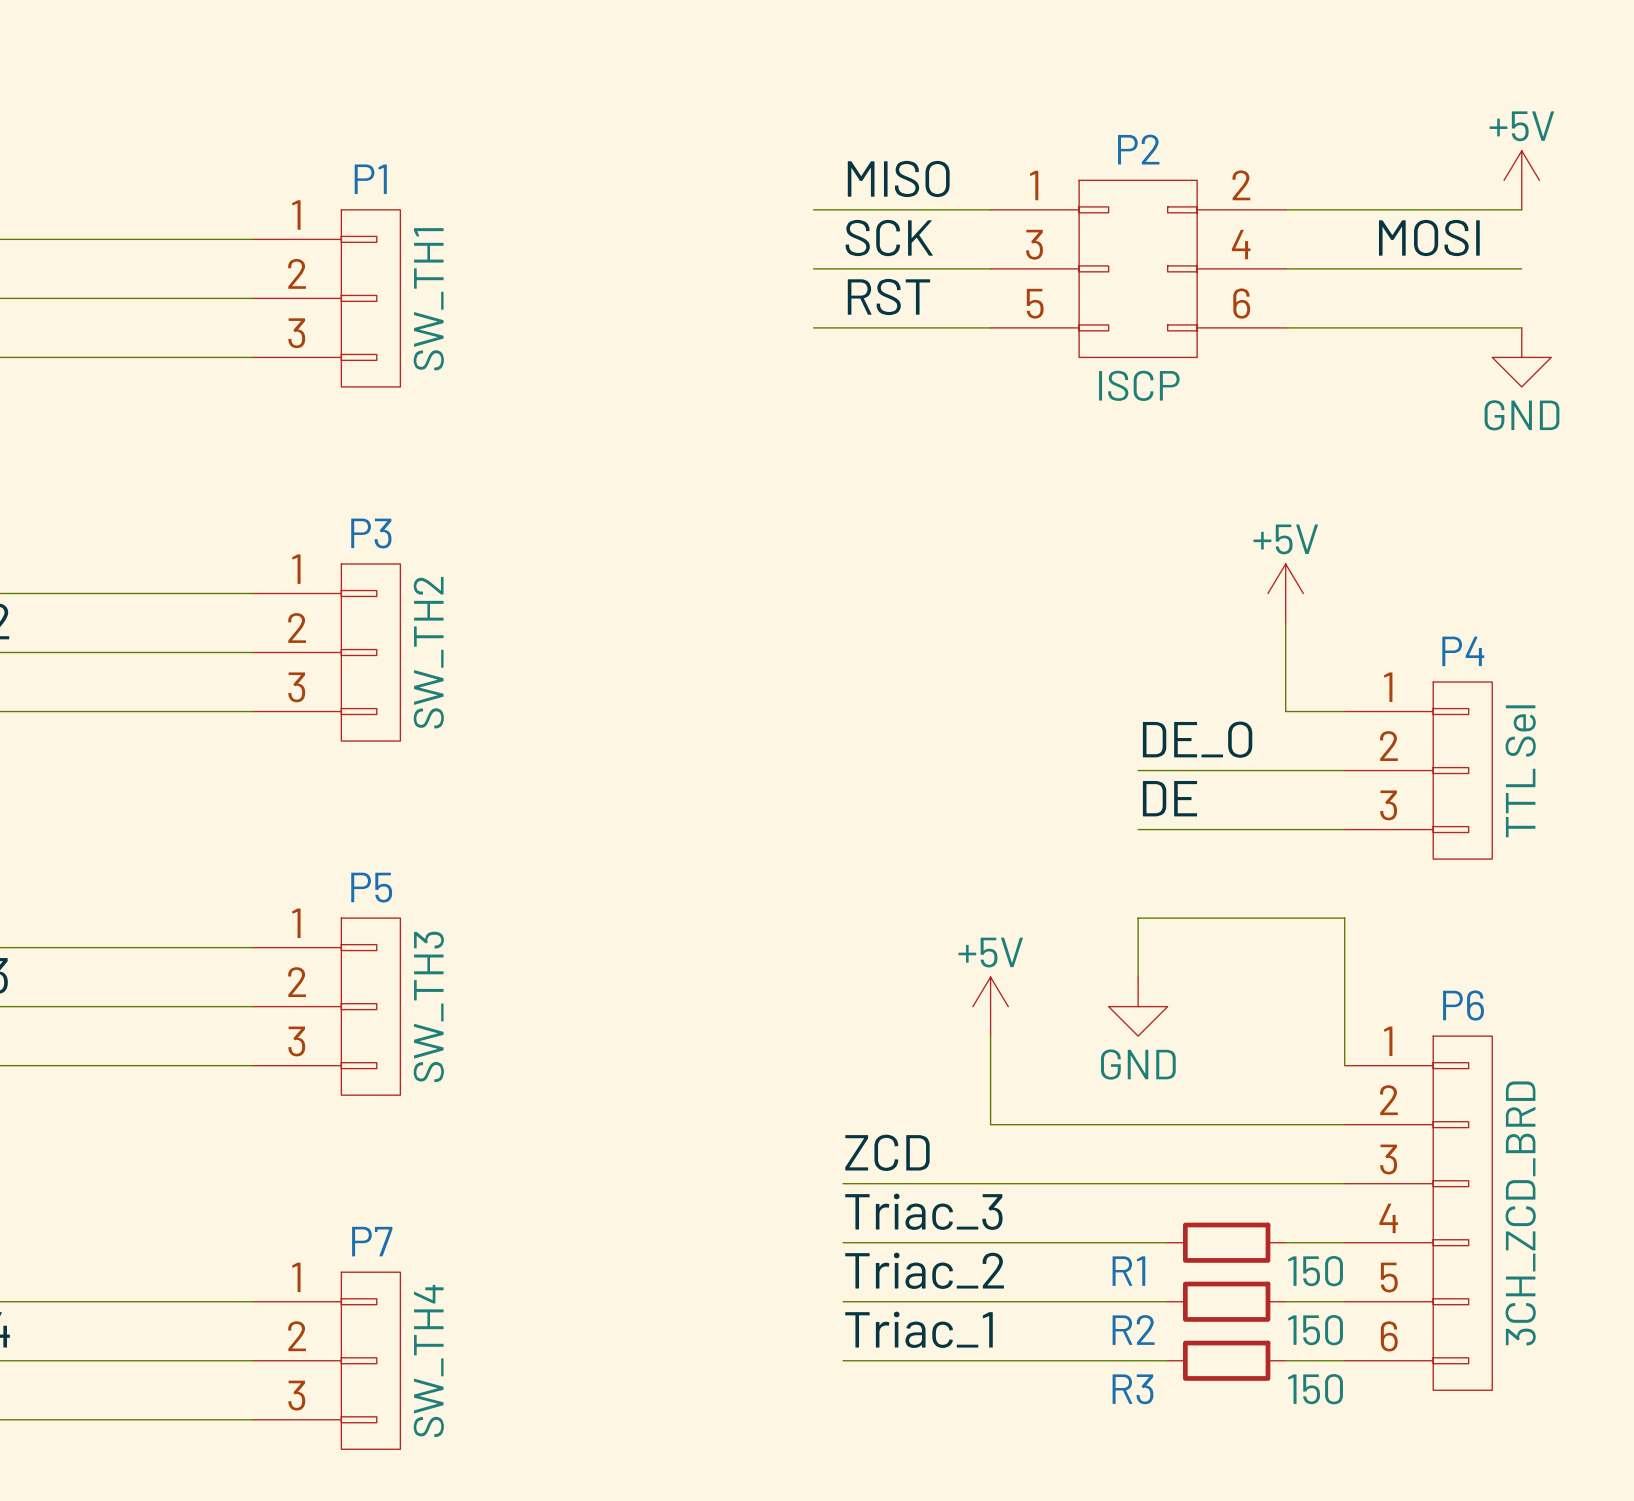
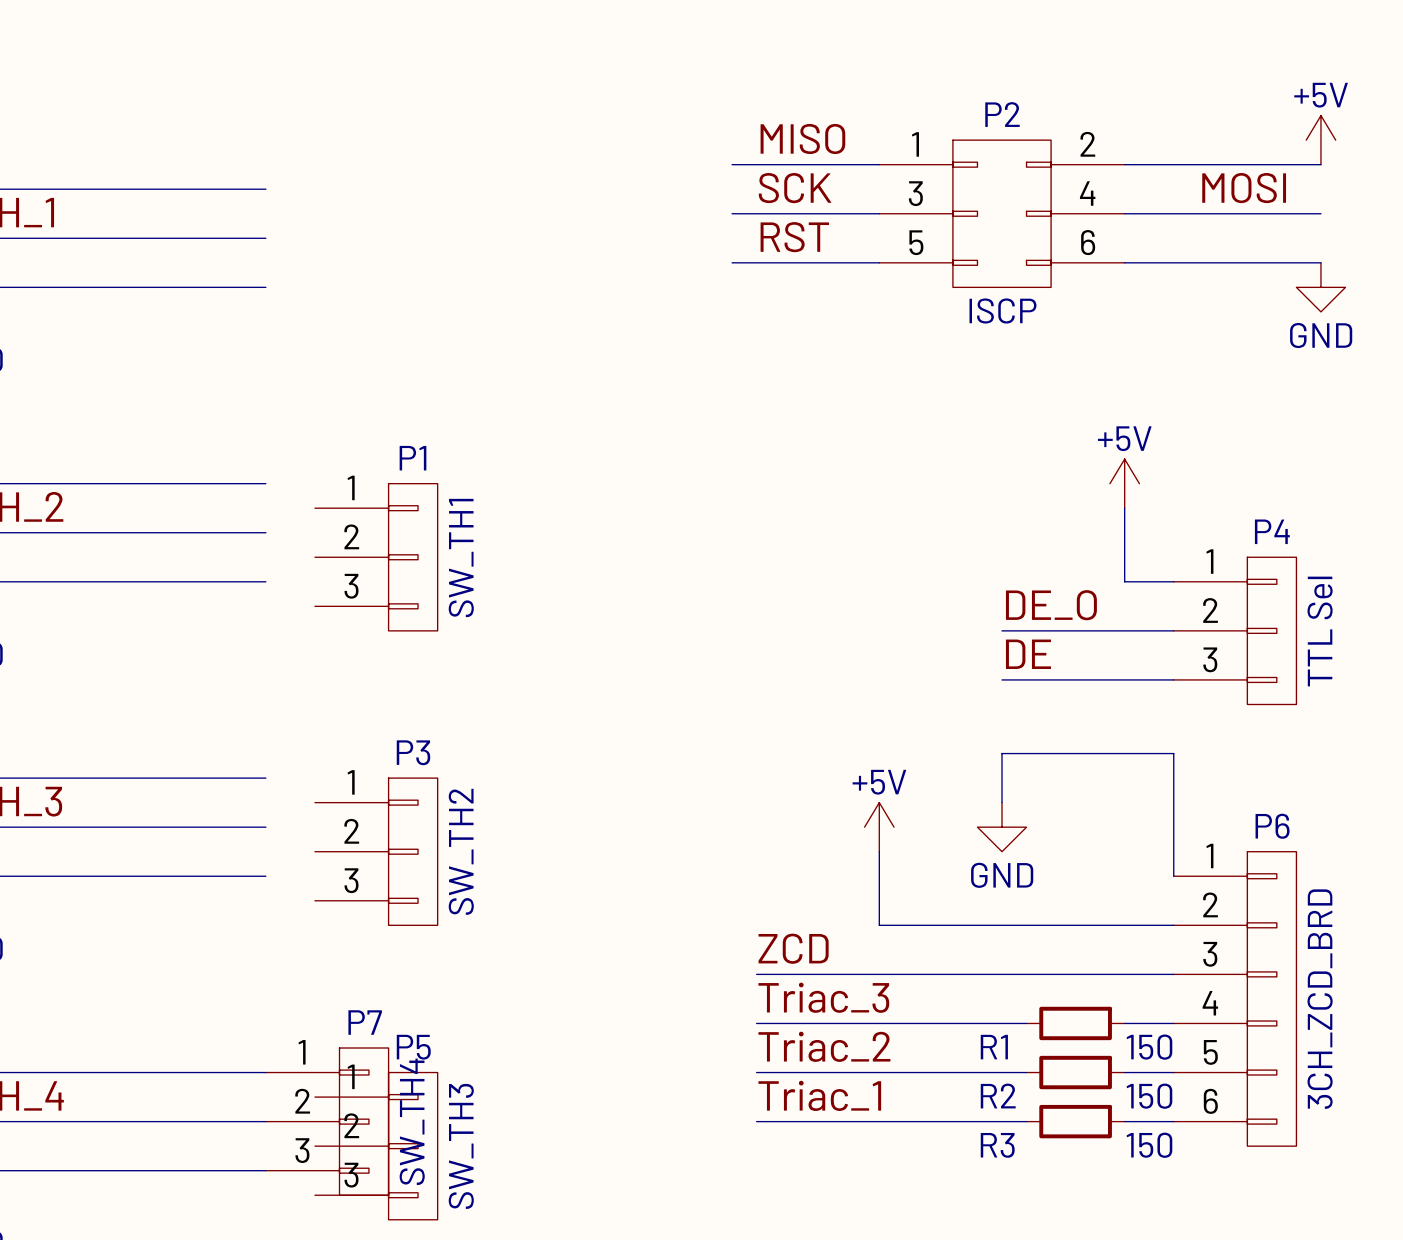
P1 position: (326, 298) -> (376, 557)
P3 position: (326, 652) -> (376, 851)
P5 position: (326, 1006) -> (376, 1146)

